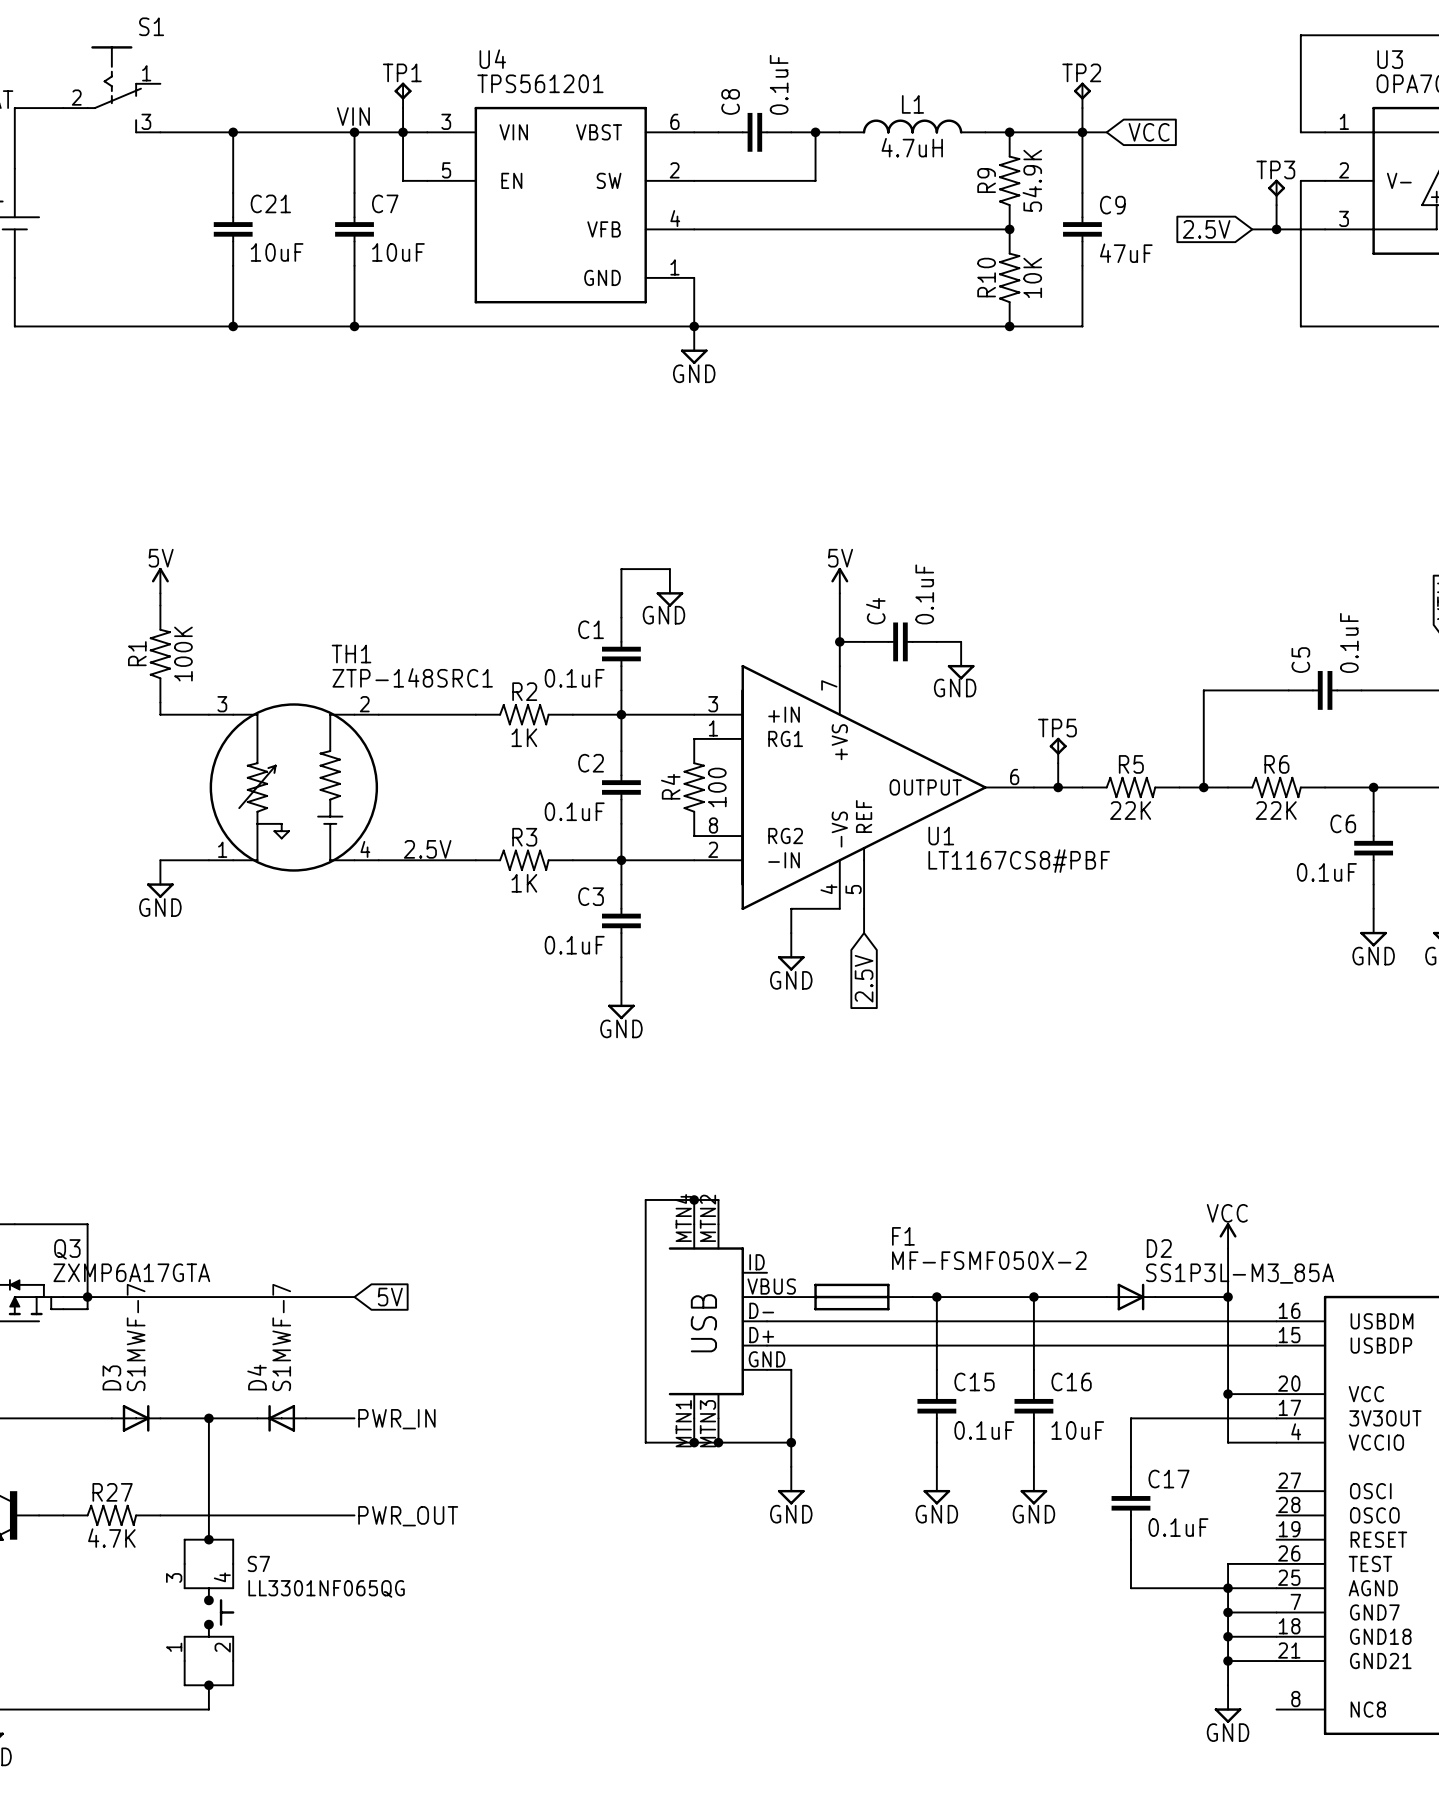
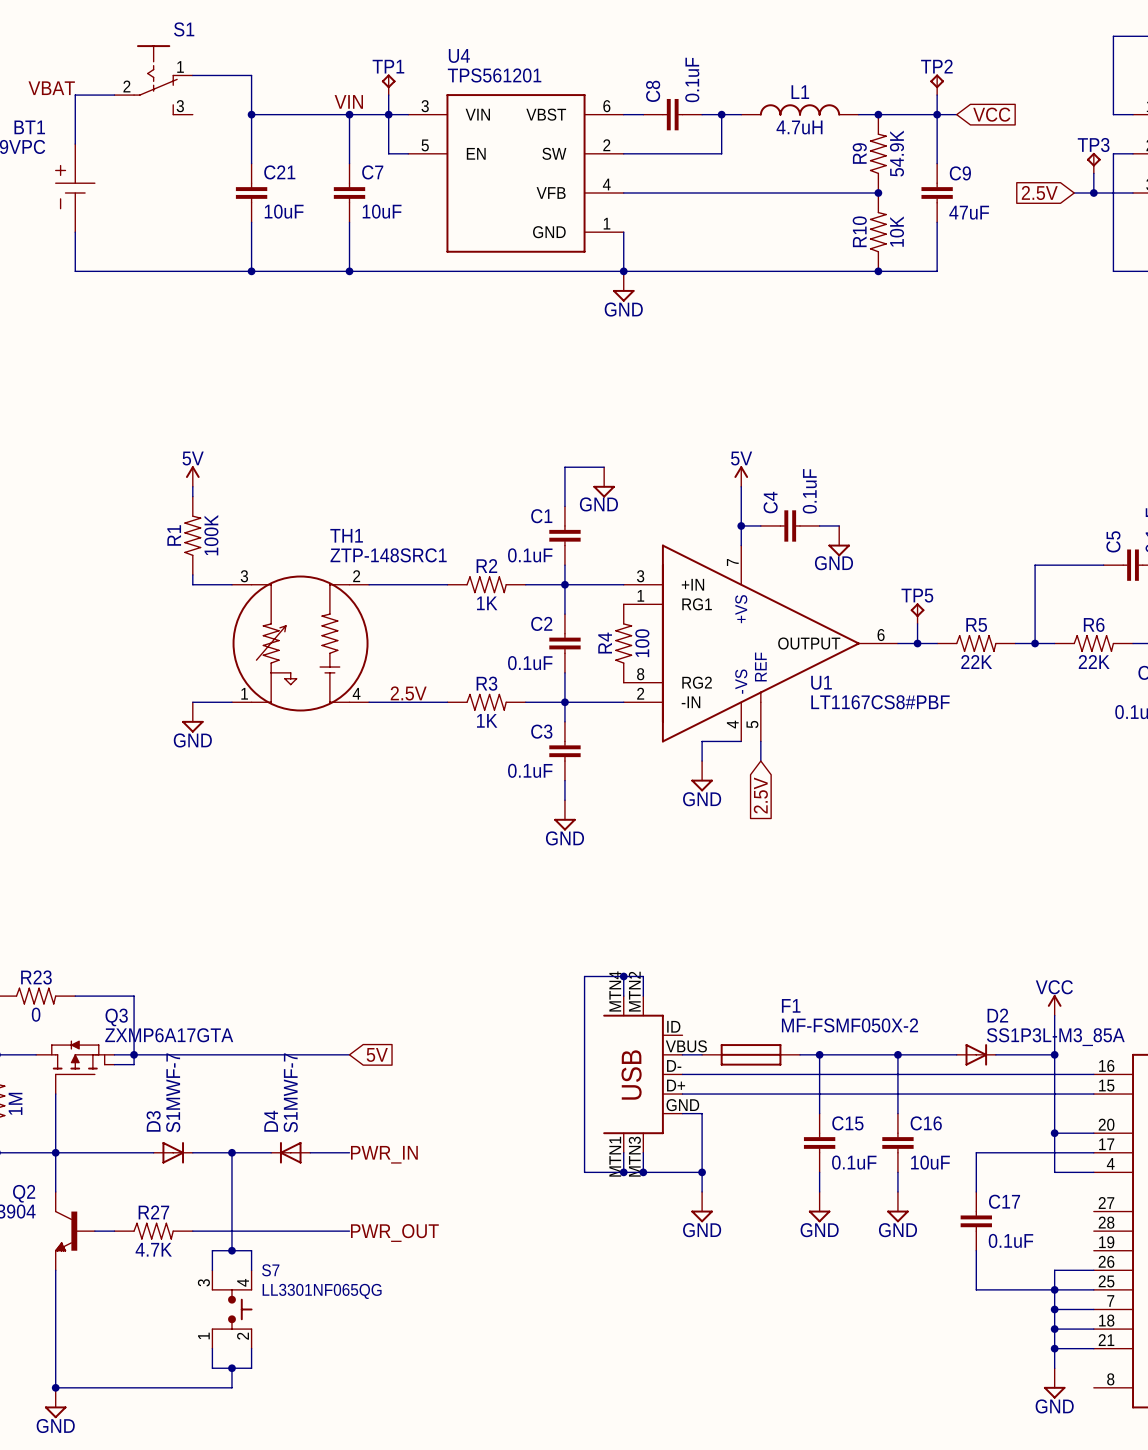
wire: (160, 132) (233, 132) -> (192, 75) (251, 75) (251, 114)

